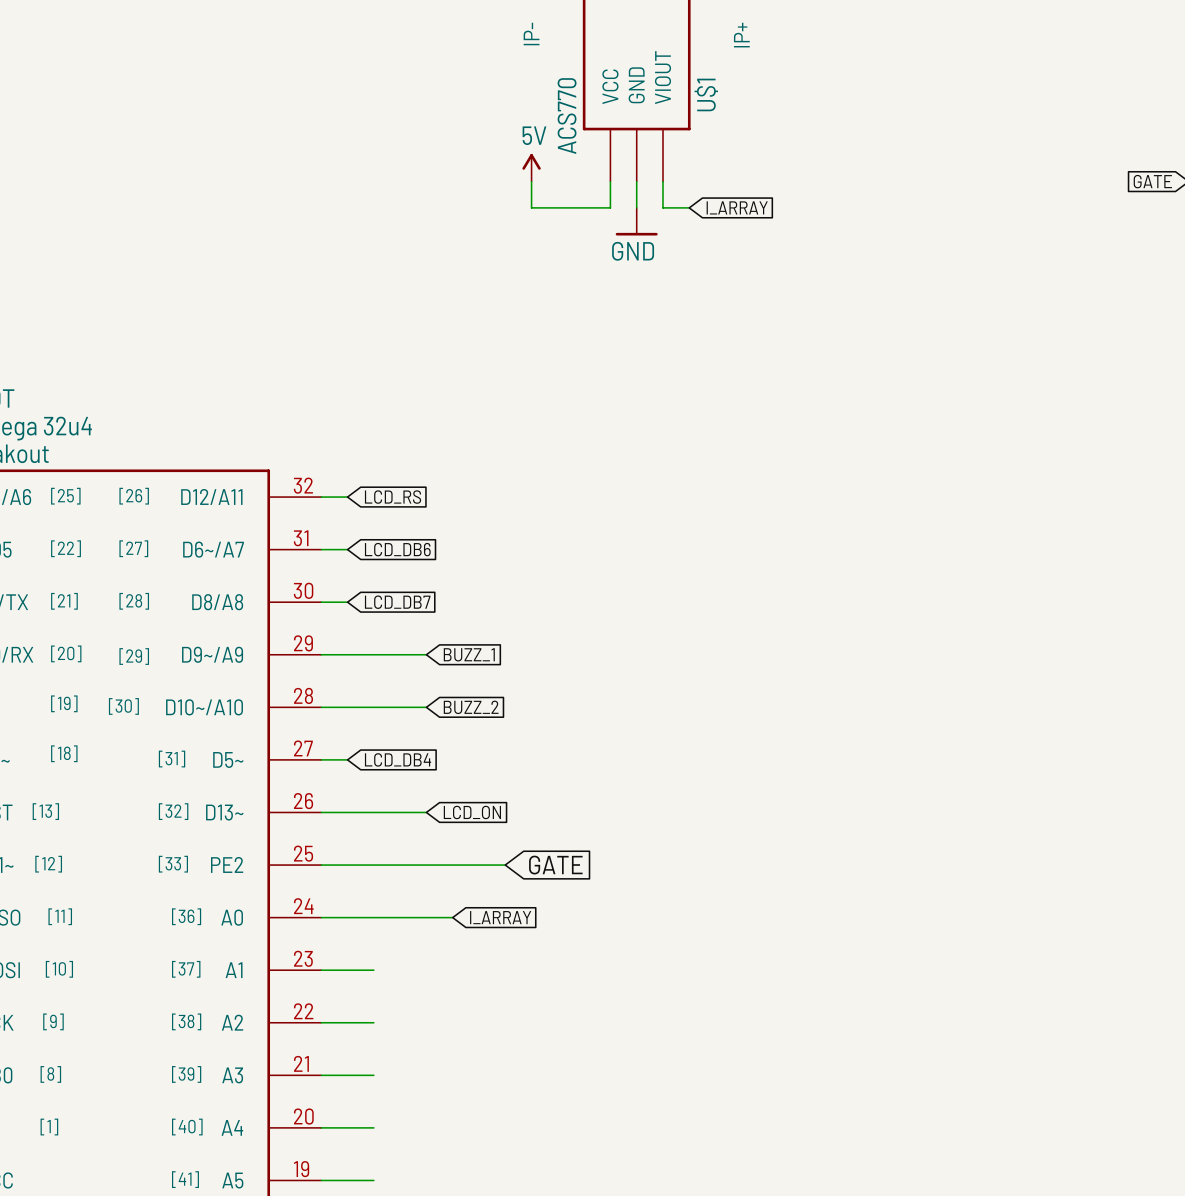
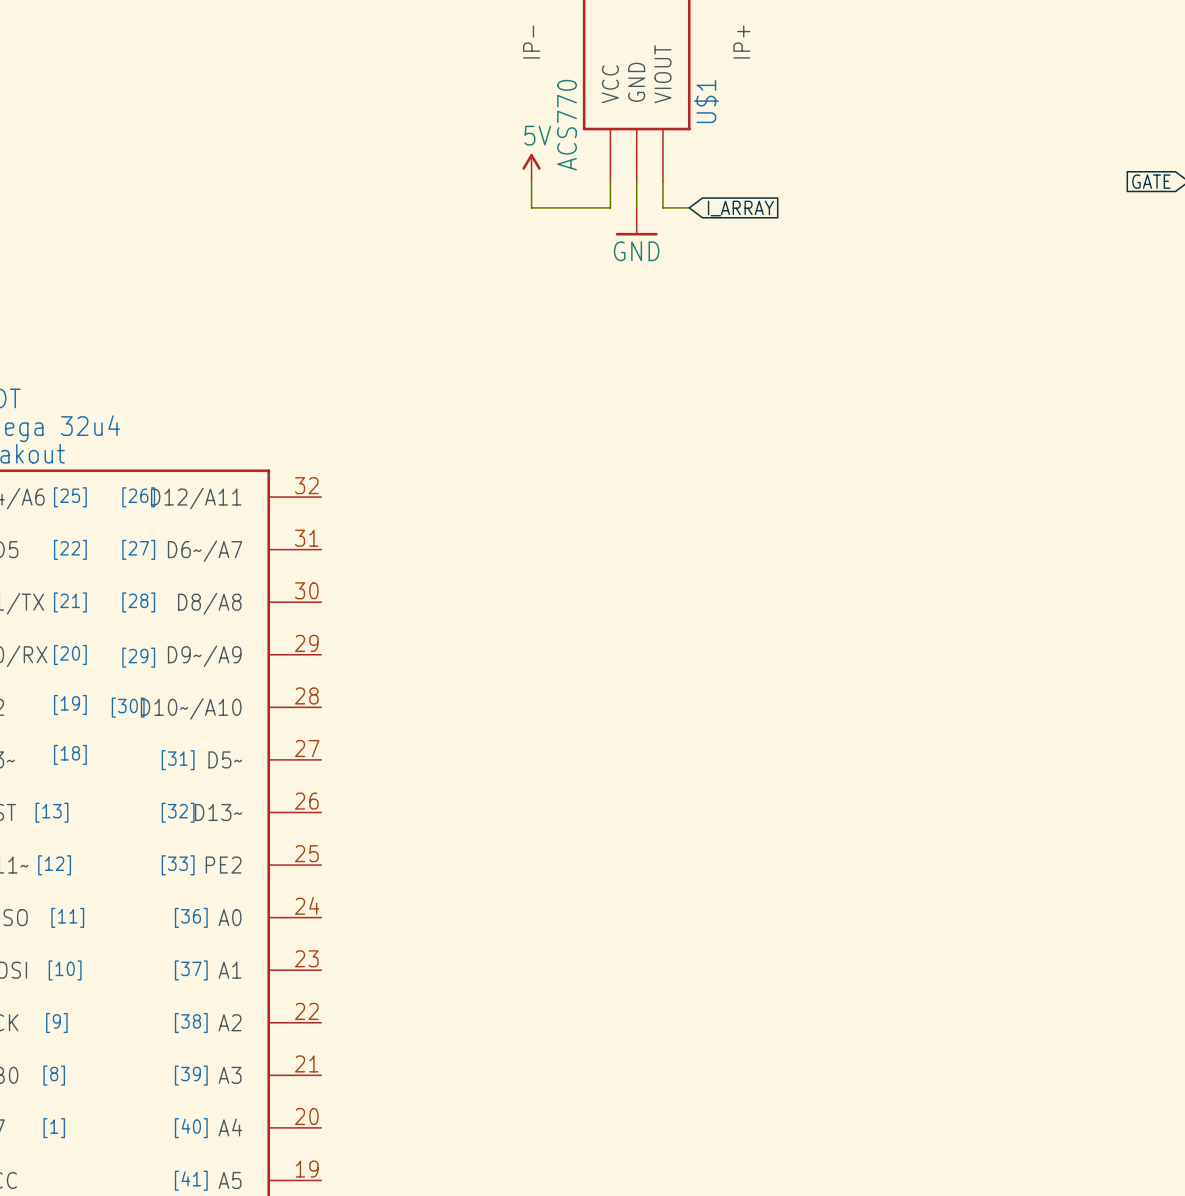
wire: (321, 497) (347, 497) -> none
global label: LCD_RS (393, 497) -> none
wire: (321, 549) (347, 549) -> none
global label: LCD_DB6 (397, 549) -> none
wire: (321, 602) (347, 602) -> none
global label: LCD_DB7 (397, 602) -> none
wire: (321, 654) (426, 654) -> none
global label: BUZZ_1 (469, 654) -> none
wire: (321, 707) (426, 707) -> none
global label: BUZZ_2 (471, 707) -> none
wire: (321, 759) (347, 759) -> none
global label: LCD_DB4 (398, 759) -> none
wire: (321, 812) (426, 812) -> none
global label: LCD_ON (472, 812) -> none
wire: (321, 865) (505, 865) -> none
global label: GATE (555, 865) -> none
wire: (321, 917) (452, 917) -> none
global label: I_ARRAY (500, 917) -> none
wire: (321, 970) (373, 970) -> none
wire: (321, 1022) (373, 1022) -> none
wire: (321, 1075) (373, 1075) -> none
wire: (321, 1127) (373, 1127) -> none
wire: (321, 1180) (373, 1180) -> none

